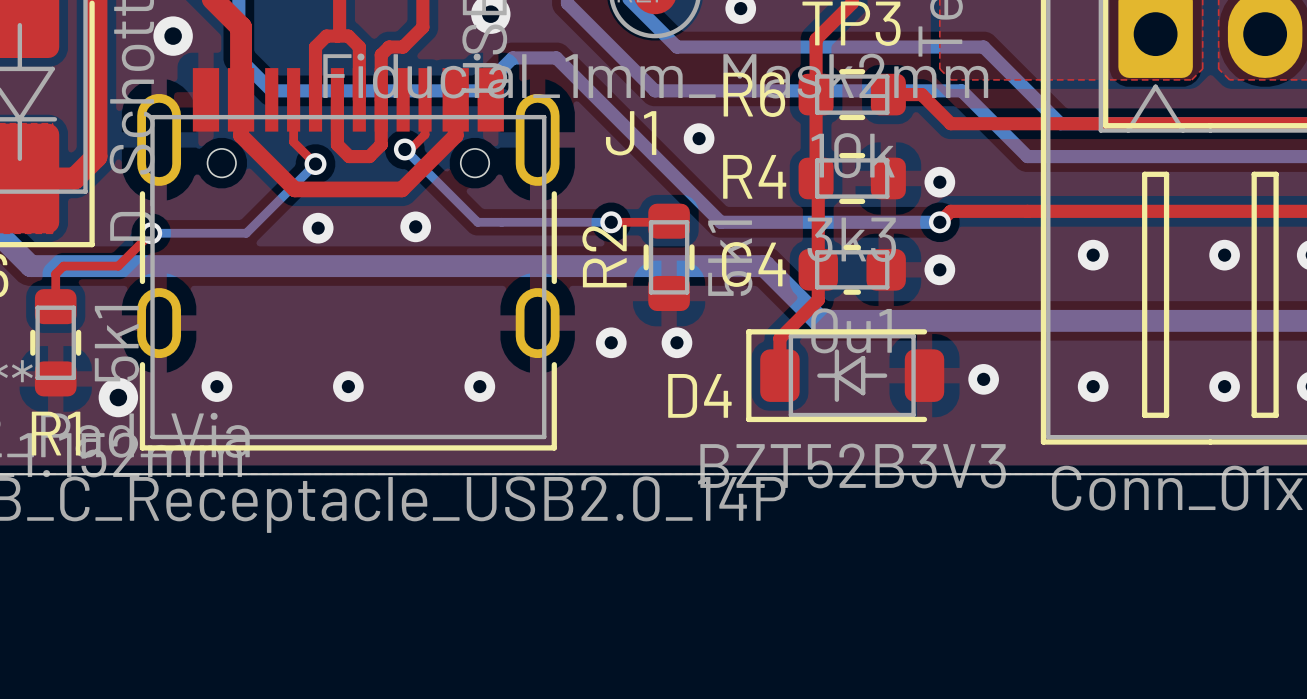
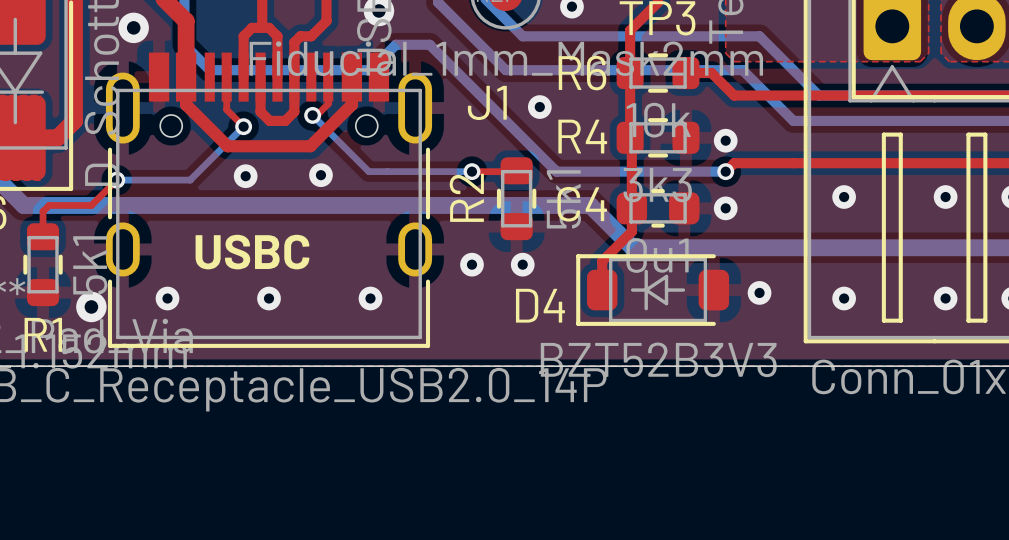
text: none -> USBC (252, 252)

